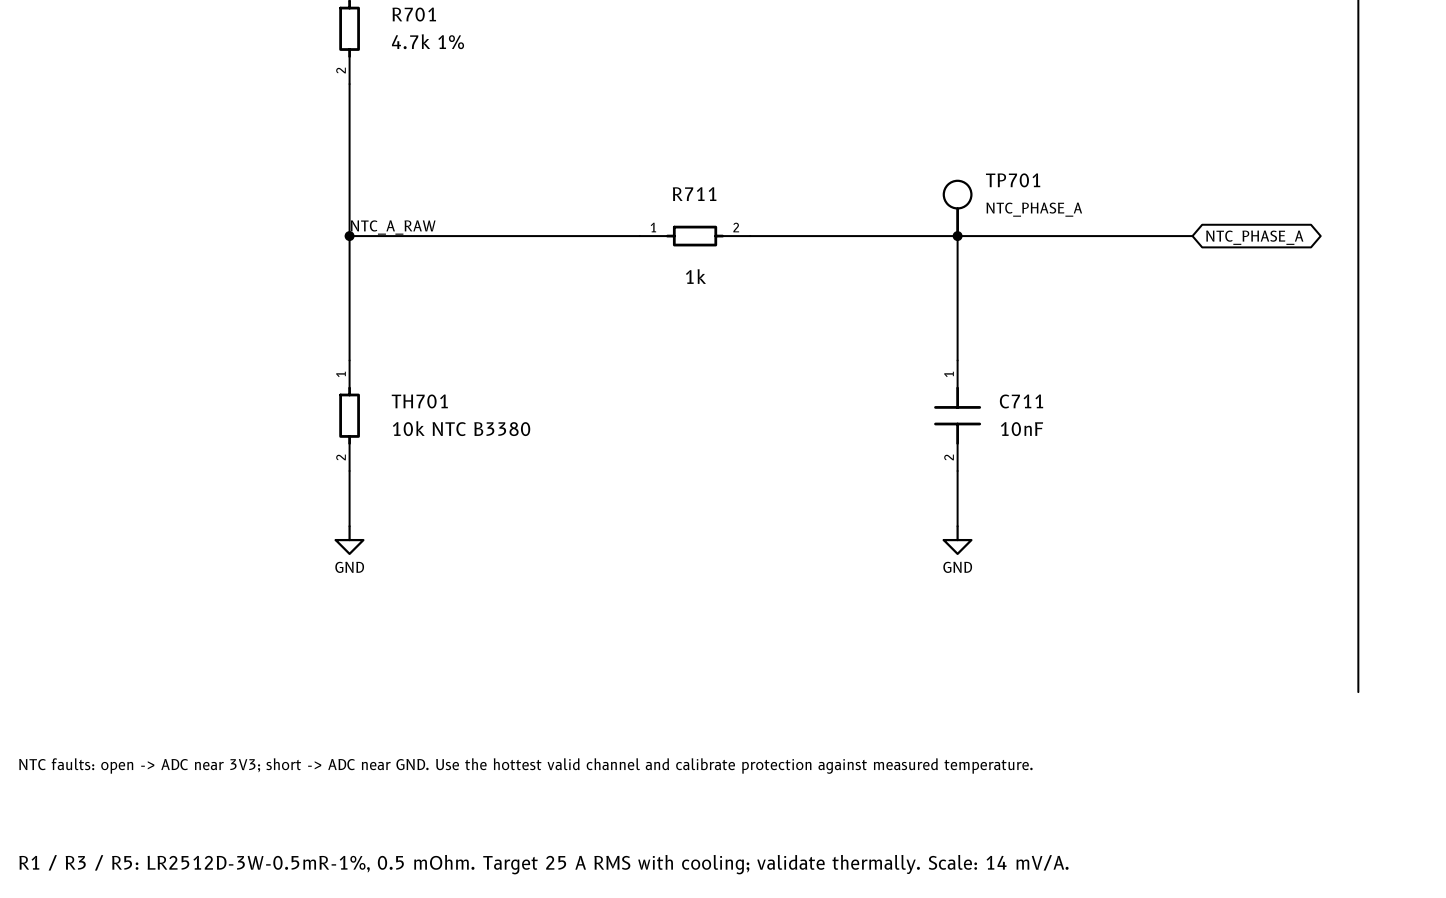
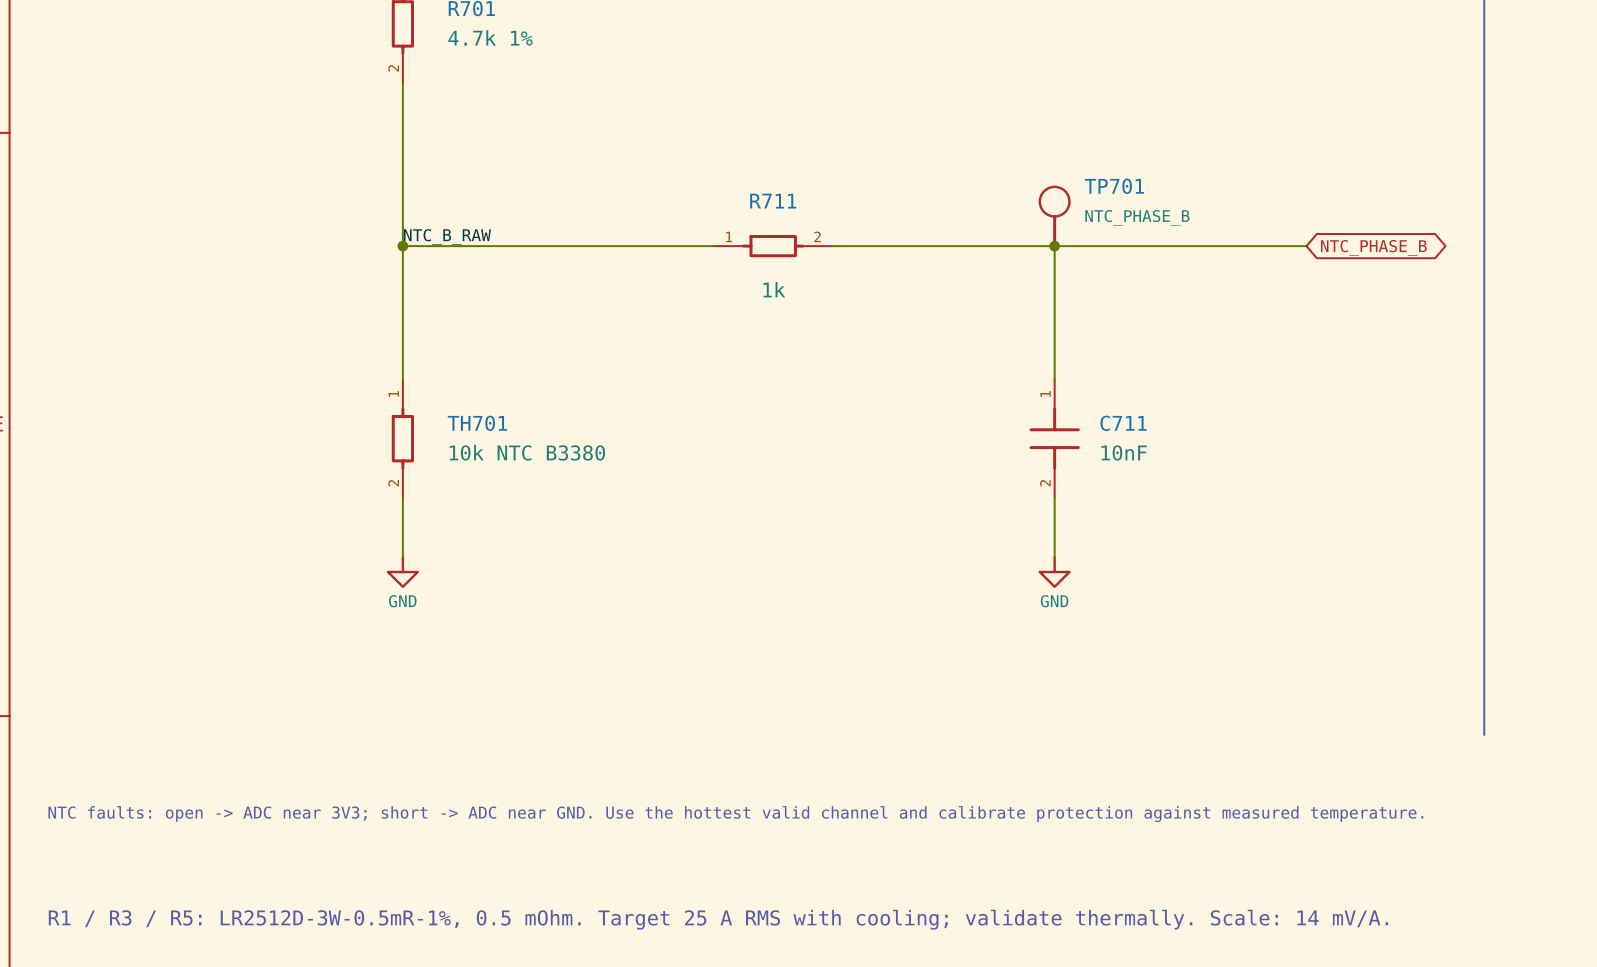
TP701 value: NTC_PHASE_A (1034, 209) -> NTC_PHASE_B (1137, 217)
label: NTC_A_RAW (393, 227) -> NTC_B_RAW (447, 236)
global label: NTC_PHASE_A (1254, 237) -> NTC_PHASE_B (1373, 247)

